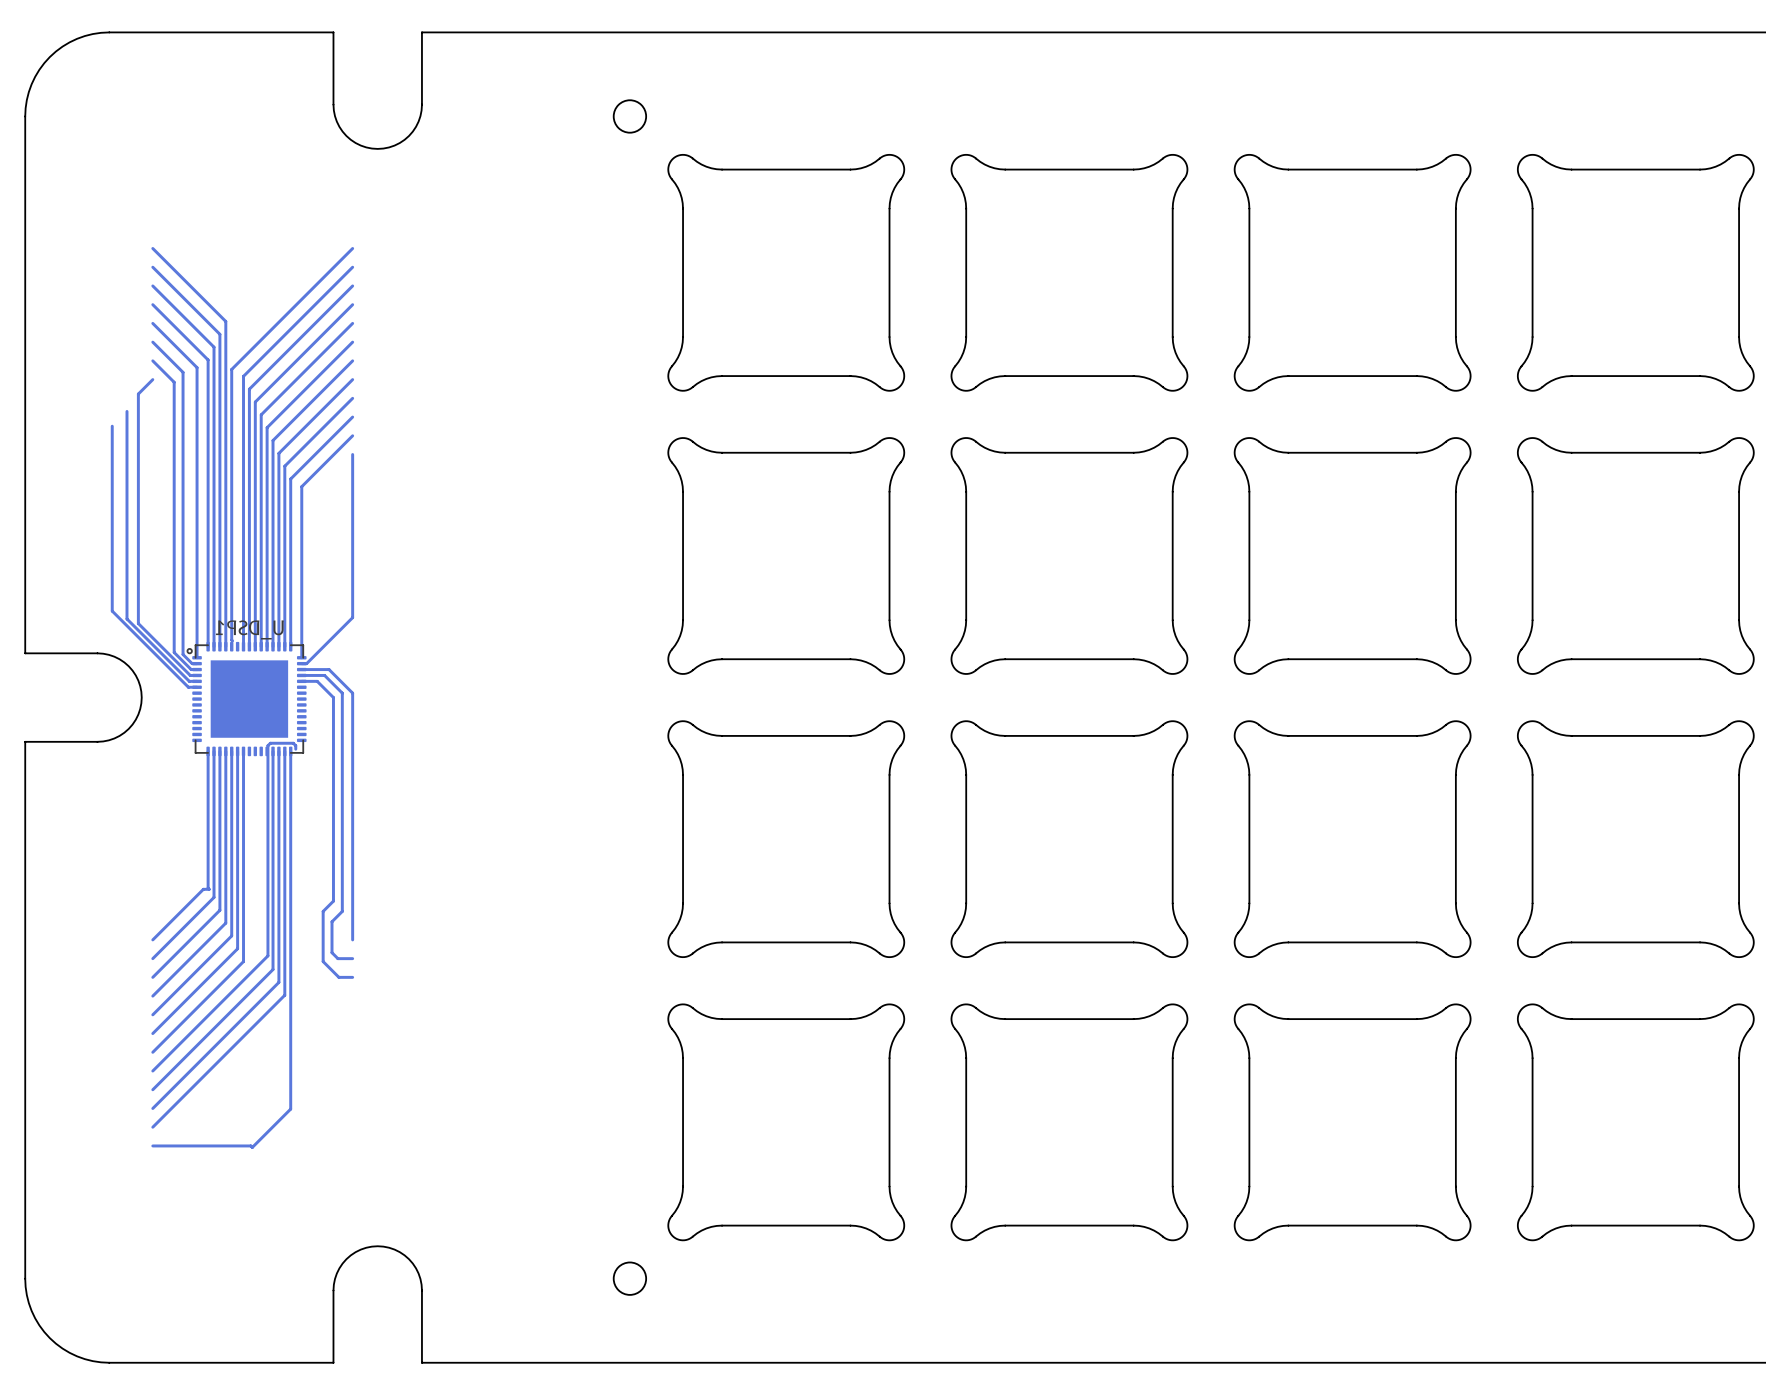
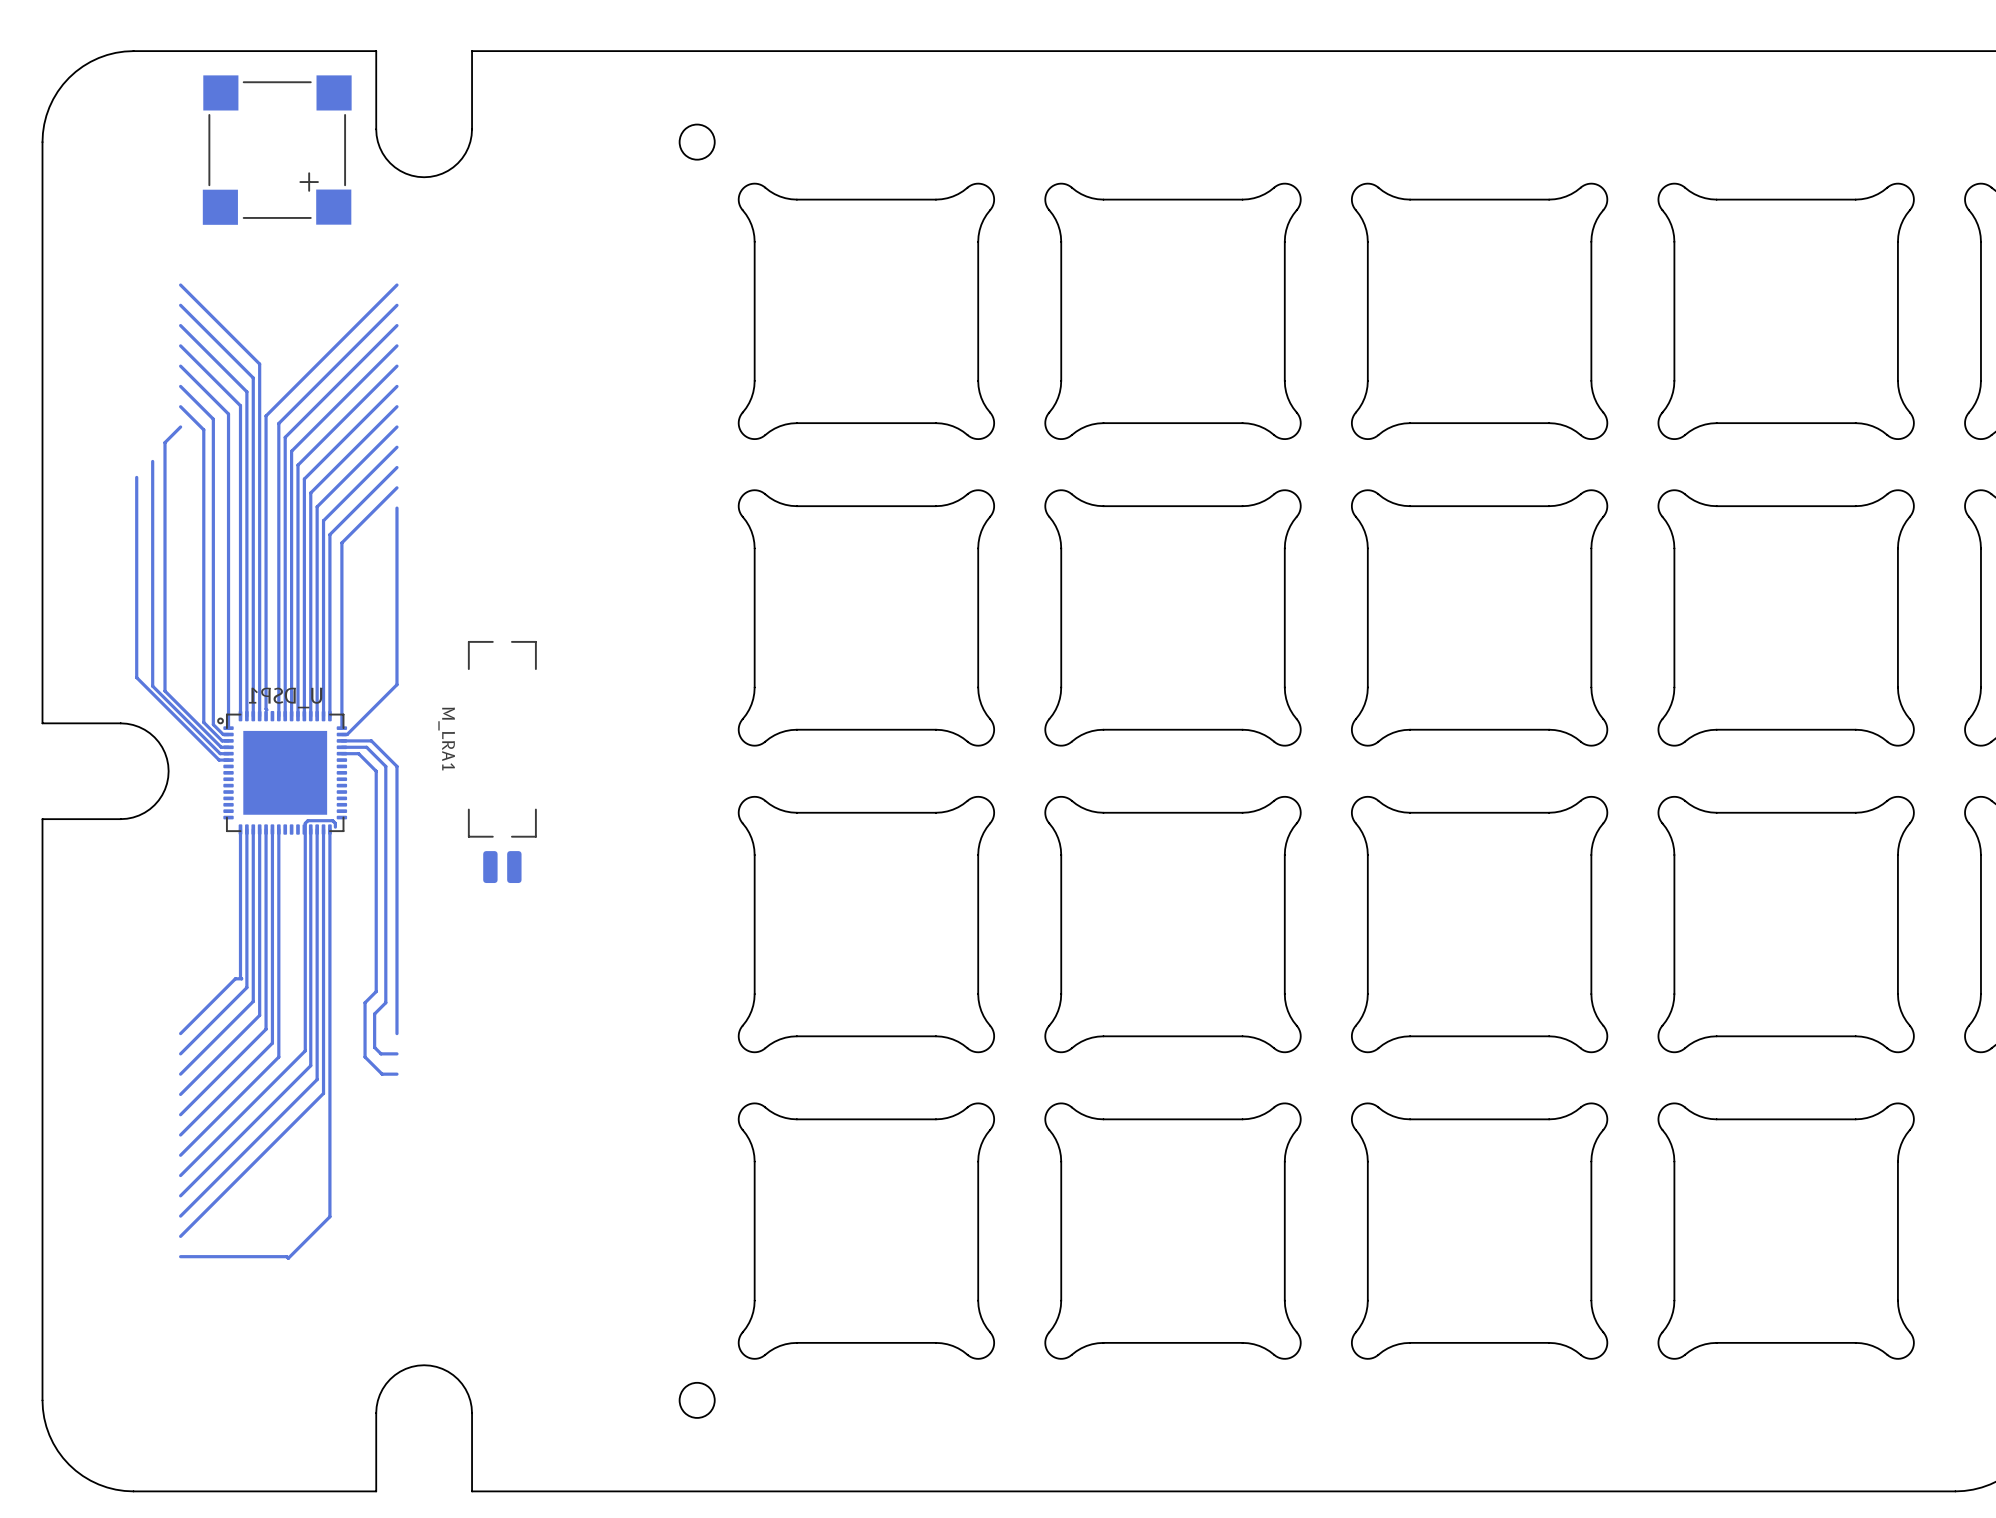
part: none -> (277, 150)
M_LRA1: none -> (502, 761)

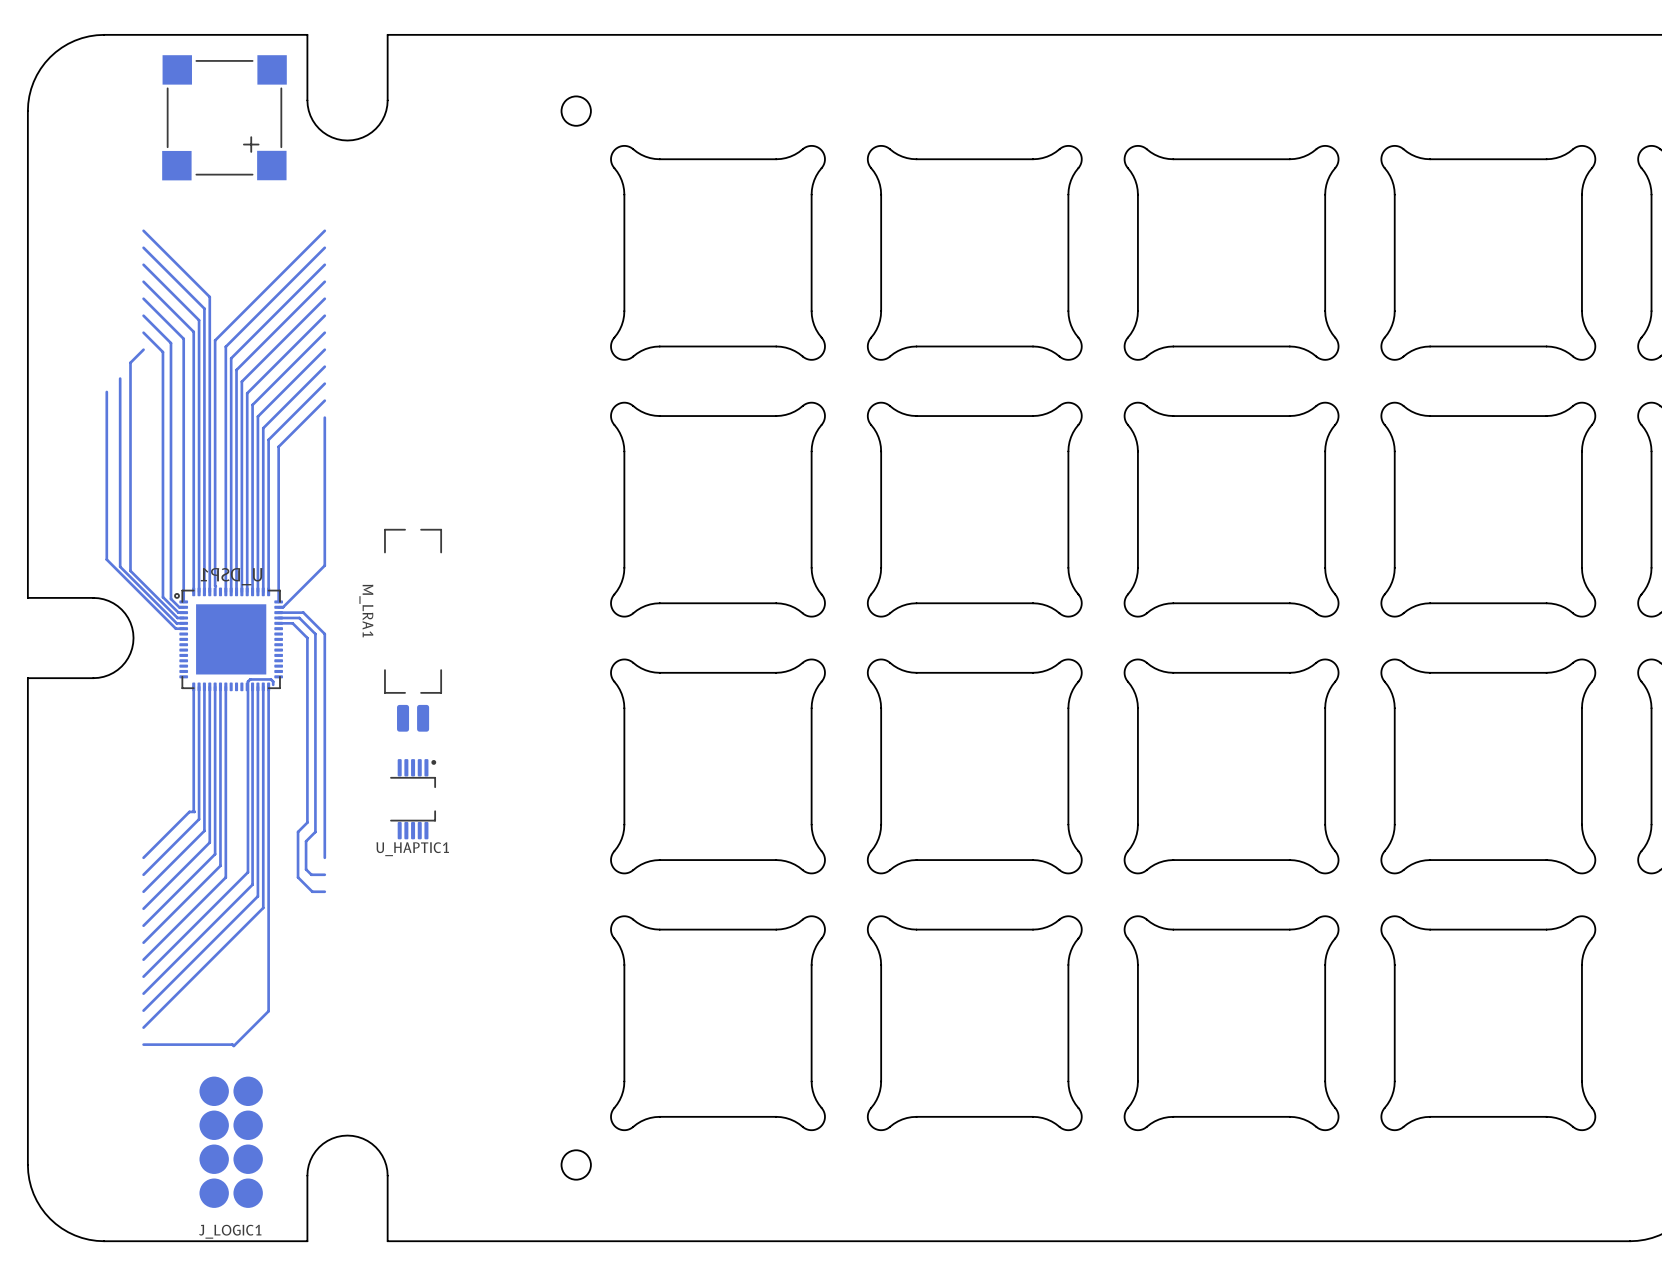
U_HAPTIC1: none -> (413, 799)
J_LOGIC1: none -> (231, 1142)

